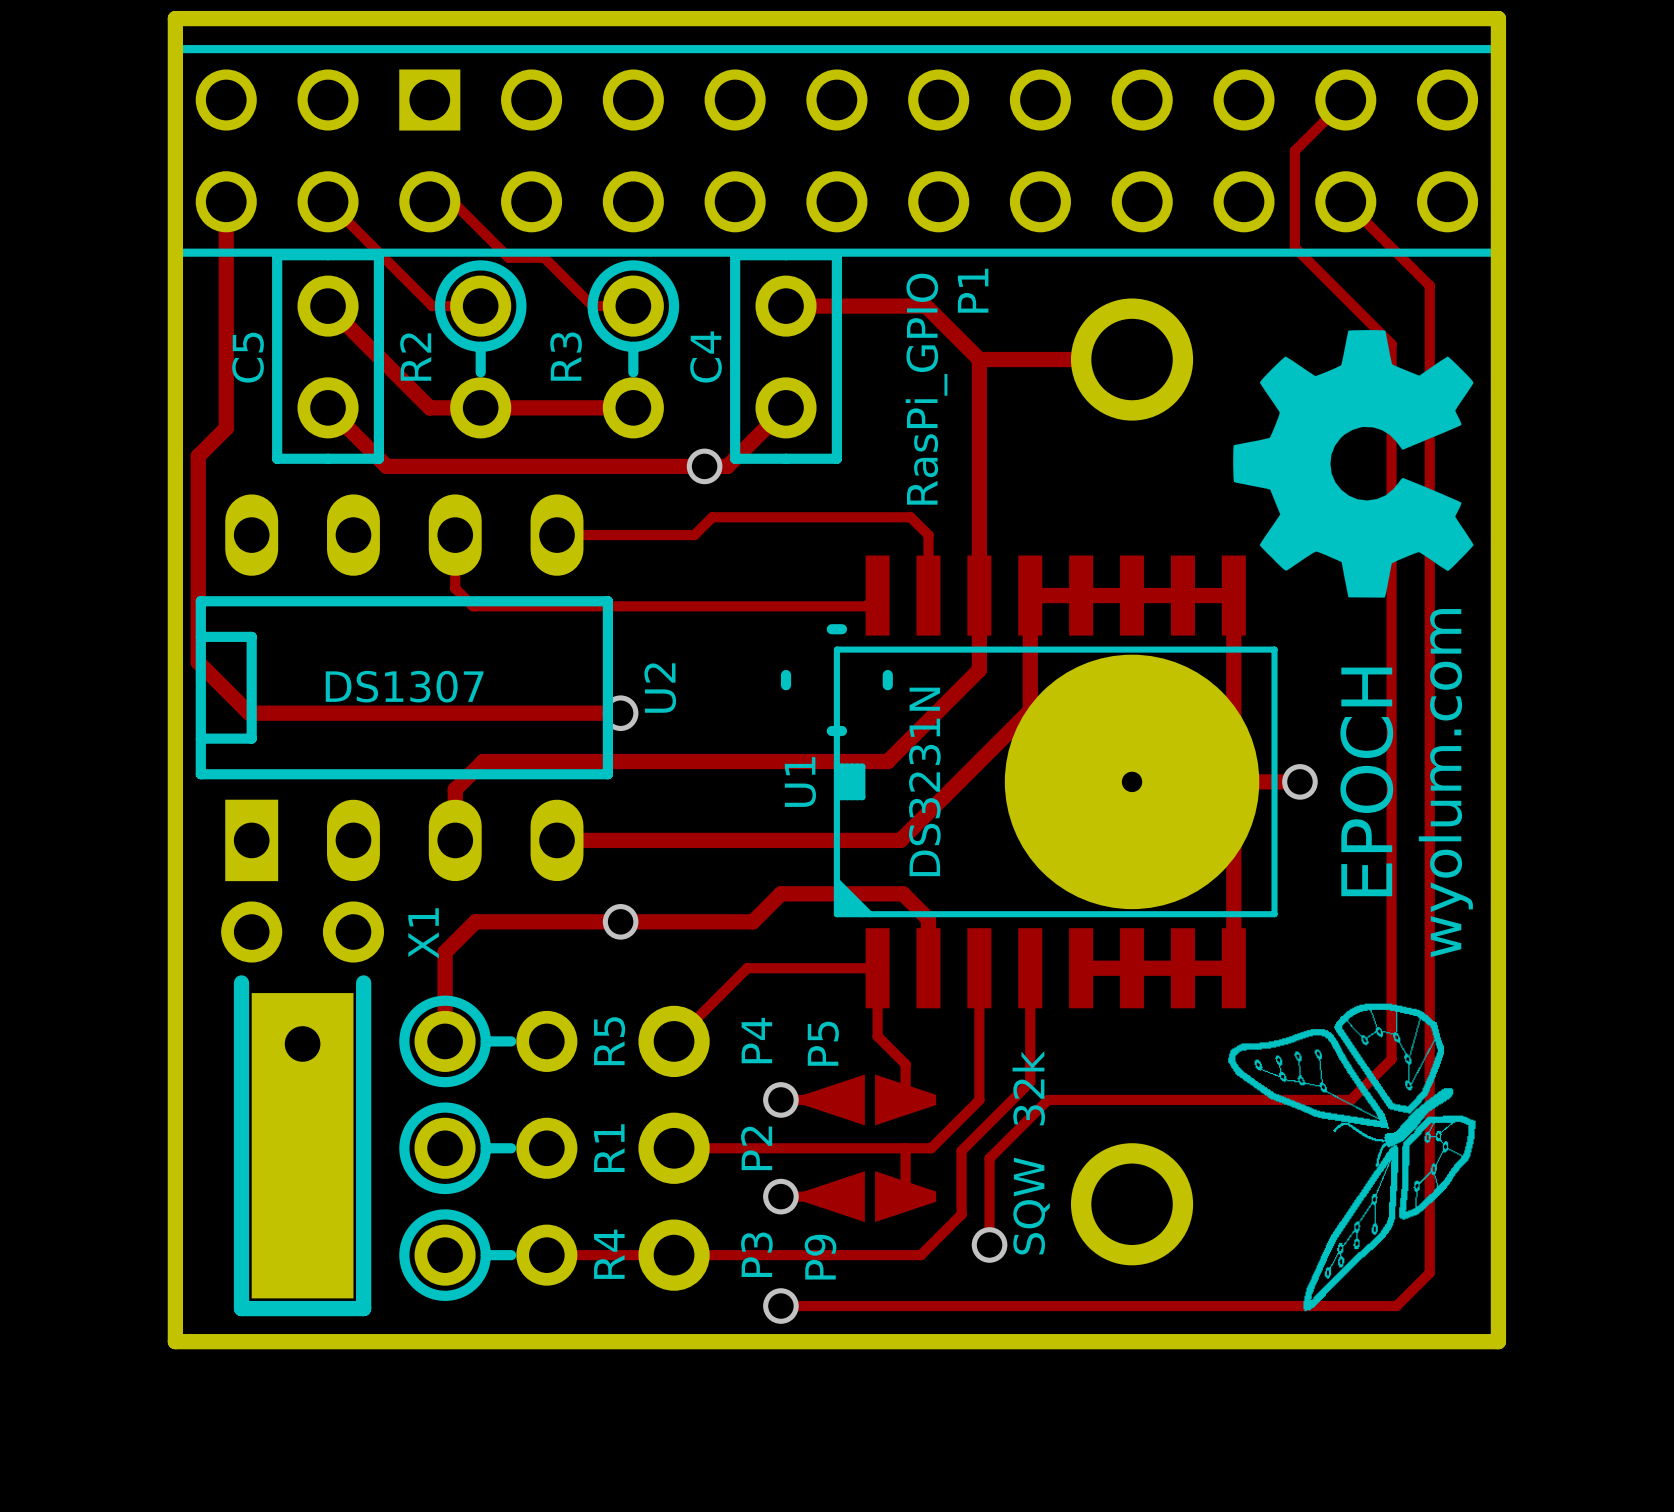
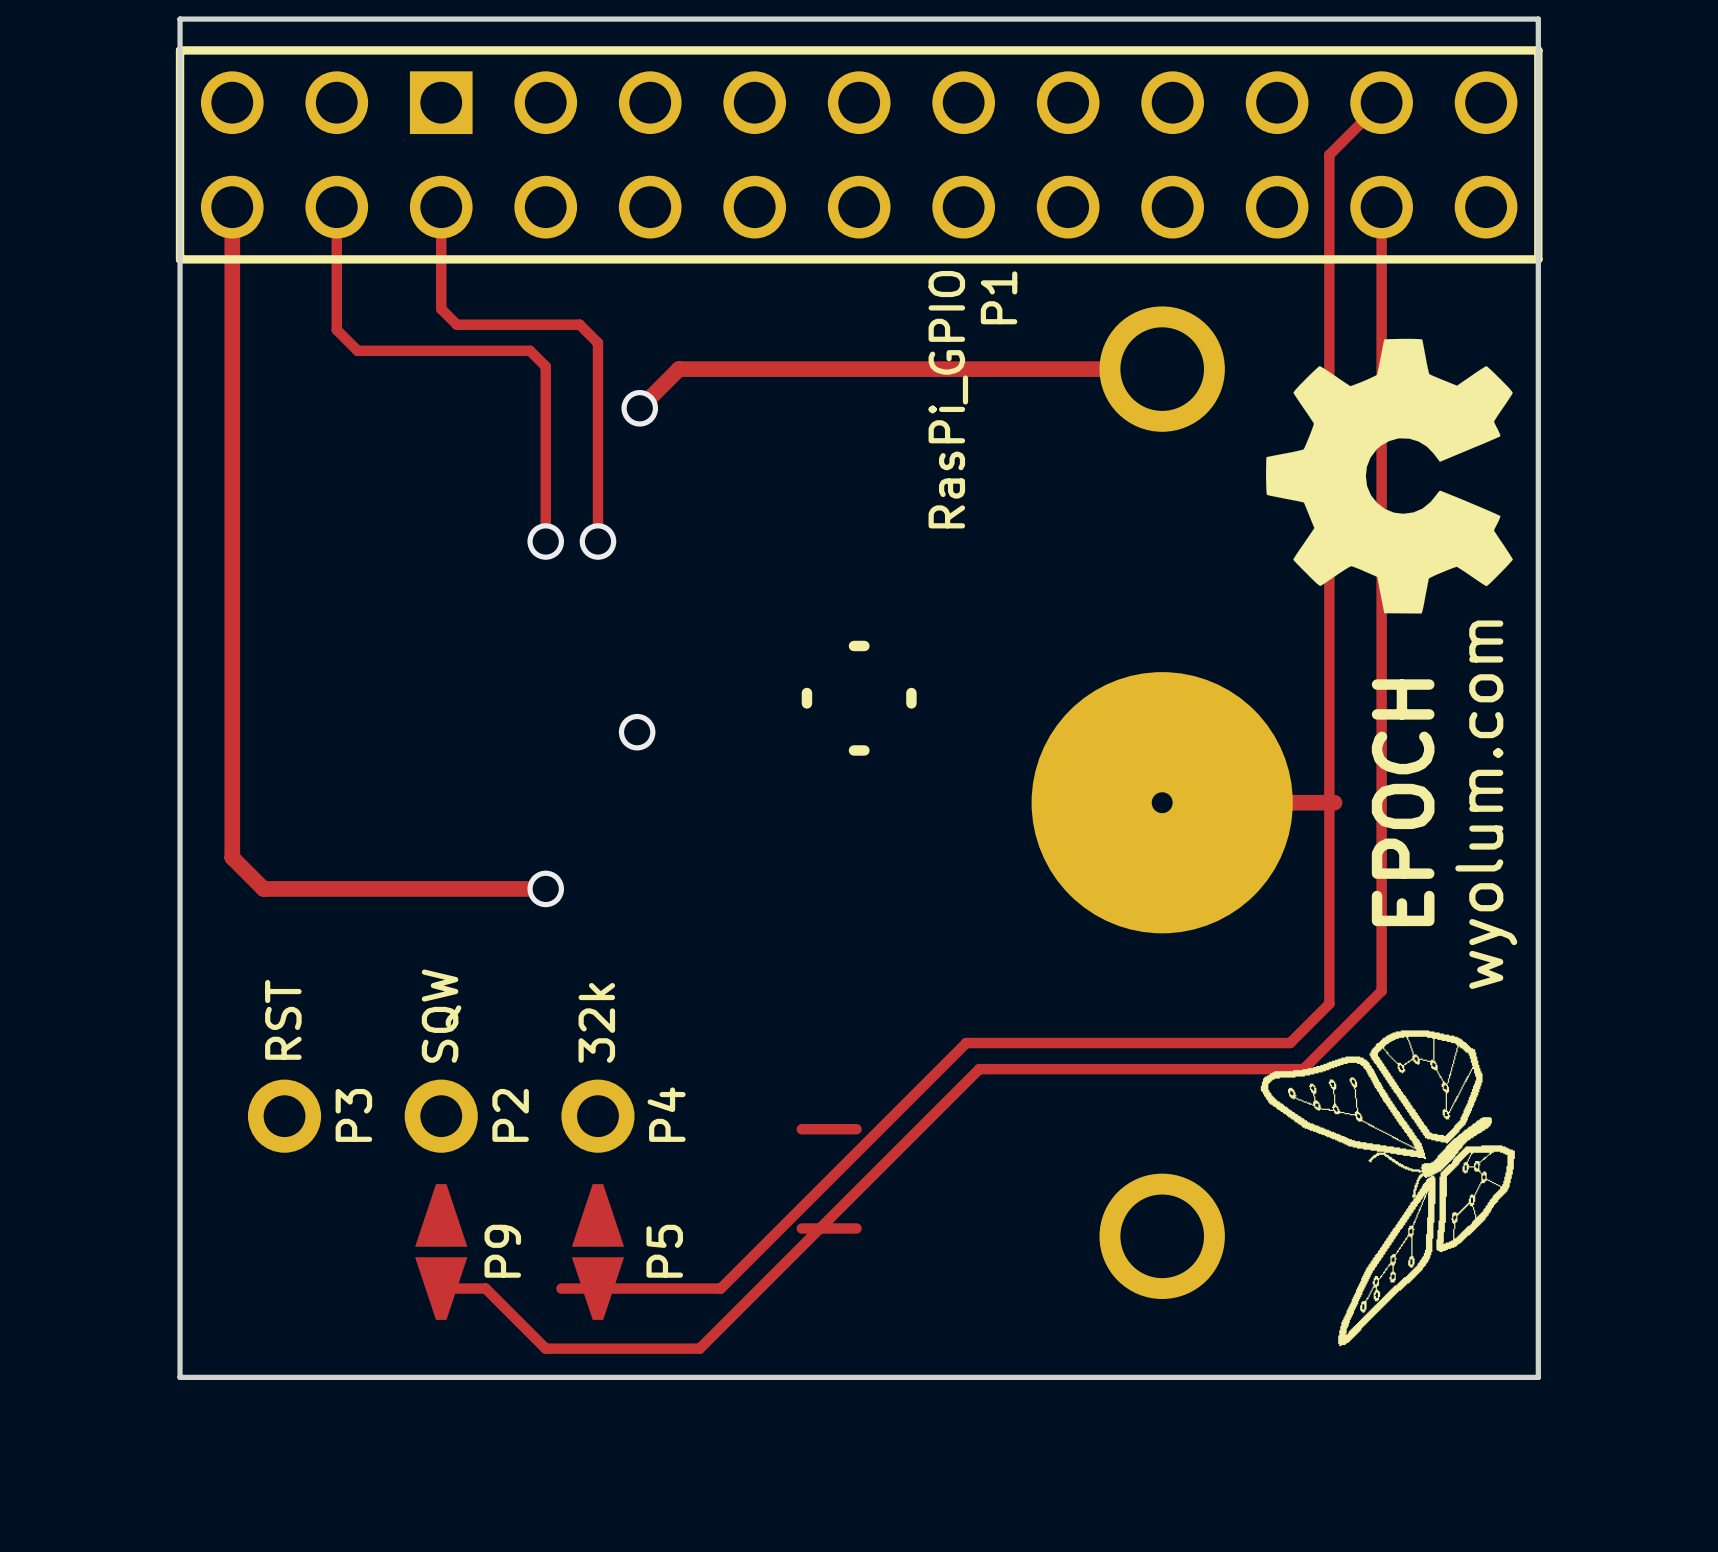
board edge width: thick (175, 18) (1498, 18) (1498, 1341) (175, 1341) (175, 18) -> thin (180, 19) (1538, 19) (1538, 1377) (180, 1377) (180, 19)
track: (328, 201) (432, 306) (480, 306) -> (336, 207) (336, 329) (357, 350) (530, 350) (545, 366) (545, 541)
track: (429, 201) (452, 201) (508, 257) (544, 257) (592, 306) (633, 306) -> (441, 207) (441, 309) (456, 324) (579, 324) (597, 342) (597, 541)
track: (1345, 201) (1429, 285) (1429, 1272) (1396, 1306) (780, 1306) -> (1381, 207) (1381, 991) (1303, 1069) (979, 1069) (699, 1348) (545, 1348) (485, 1288) (441, 1288)
track: (1294, 247) (1391, 344) (1391, 1059) (1350, 1099) (1048, 1099) (989, 1158) (989, 1244) -> (1329, 254) (1329, 1003) (1290, 1043) (966, 1043) (720, 1288)
track: (328, 306) (429, 407) (633, 407) -> none
track: (786, 306) (925, 306) (979, 359) (979, 669) (887, 761) (483, 761) (455, 789) (455, 840) -> none
R2: (480, 349) -> none
R3: (633, 349) -> none
C5: (328, 356) -> none
C4: (786, 356) -> none
track: none -> (1005, 369) (678, 369) (639, 408)
via: none -> (639, 408)
track: (328, 407) (386, 466) (727, 466) (786, 407) -> none
track: (226, 428) (198, 456) (198, 662) (249, 713) (620, 713) -> (232, 439) (232, 857) (263, 888) (545, 888)
via: (704, 466) -> none
via: none -> (545, 541)
via: none -> (597, 541)
track: (455, 535) (455, 588) (473, 606) (866, 606) (877, 595) -> none
track: (557, 535) (694, 535) (712, 517) (910, 517) (928, 535) (928, 595) -> none
U2: DS1307 (404, 687) -> none
U1: DS3231N (1055, 781) -> none
via: (1299, 781) -> none
track: (557, 840) (900, 840) (1030, 710) (1030, 595) (1233, 595) (1233, 968) (1081, 968) -> none
via position: (620, 921) -> (545, 888)
track: (928, 968) (928, 919) (903, 893) (780, 893) (752, 921) (475, 921) (445, 952) (445, 1041) -> none
track: (979, 968) (979, 1100) (931, 1148) (674, 1148) -> none
track: (1030, 968) (1030, 1082) (961, 1150) (961, 1214) (920, 1255) (702, 1255) -> none
P3 value: none -> RST (283, 1019)
P4 name position: P4 (756, 1040) -> P4 (666, 1114)
R5: (488, 1041) -> none
track: (674, 1041) (747, 968) (877, 968) (877, 1036) (905, 1064) (905, 1099) -> none
P4 position: (674, 1041) -> (597, 1116)
P5 value position: 32k (1028, 1088) -> 32k (596, 1022)
via: (780, 1099) -> none
P5 rotation: 0° (869, 1099) -> 90° clockwise (597, 1252)
P5 position: (869, 1099) -> (597, 1252)
X1: (302, 1108) -> none
R1: (488, 1148) -> none
P2 position: (674, 1148) -> (441, 1116)
P2 name position: P2 (756, 1148) -> P2 (510, 1115)
track: (905, 1148) (905, 1196) -> none
via: (780, 1196) -> none
P9 rotation: 0° (869, 1196) -> 90° clockwise (441, 1252)
P9 position: (869, 1196) -> (441, 1252)
P9 value position: SQW (1031, 1206) -> SQW (441, 1016)
via: (989, 1244) -> none
P3 name position: P3 (756, 1254) -> P3 (353, 1115)
R4: (488, 1255) -> none
P3 position: (674, 1255) -> (284, 1116)
P9 name position: P9 (820, 1257) -> P9 (502, 1251)
via: (780, 1306) -> none

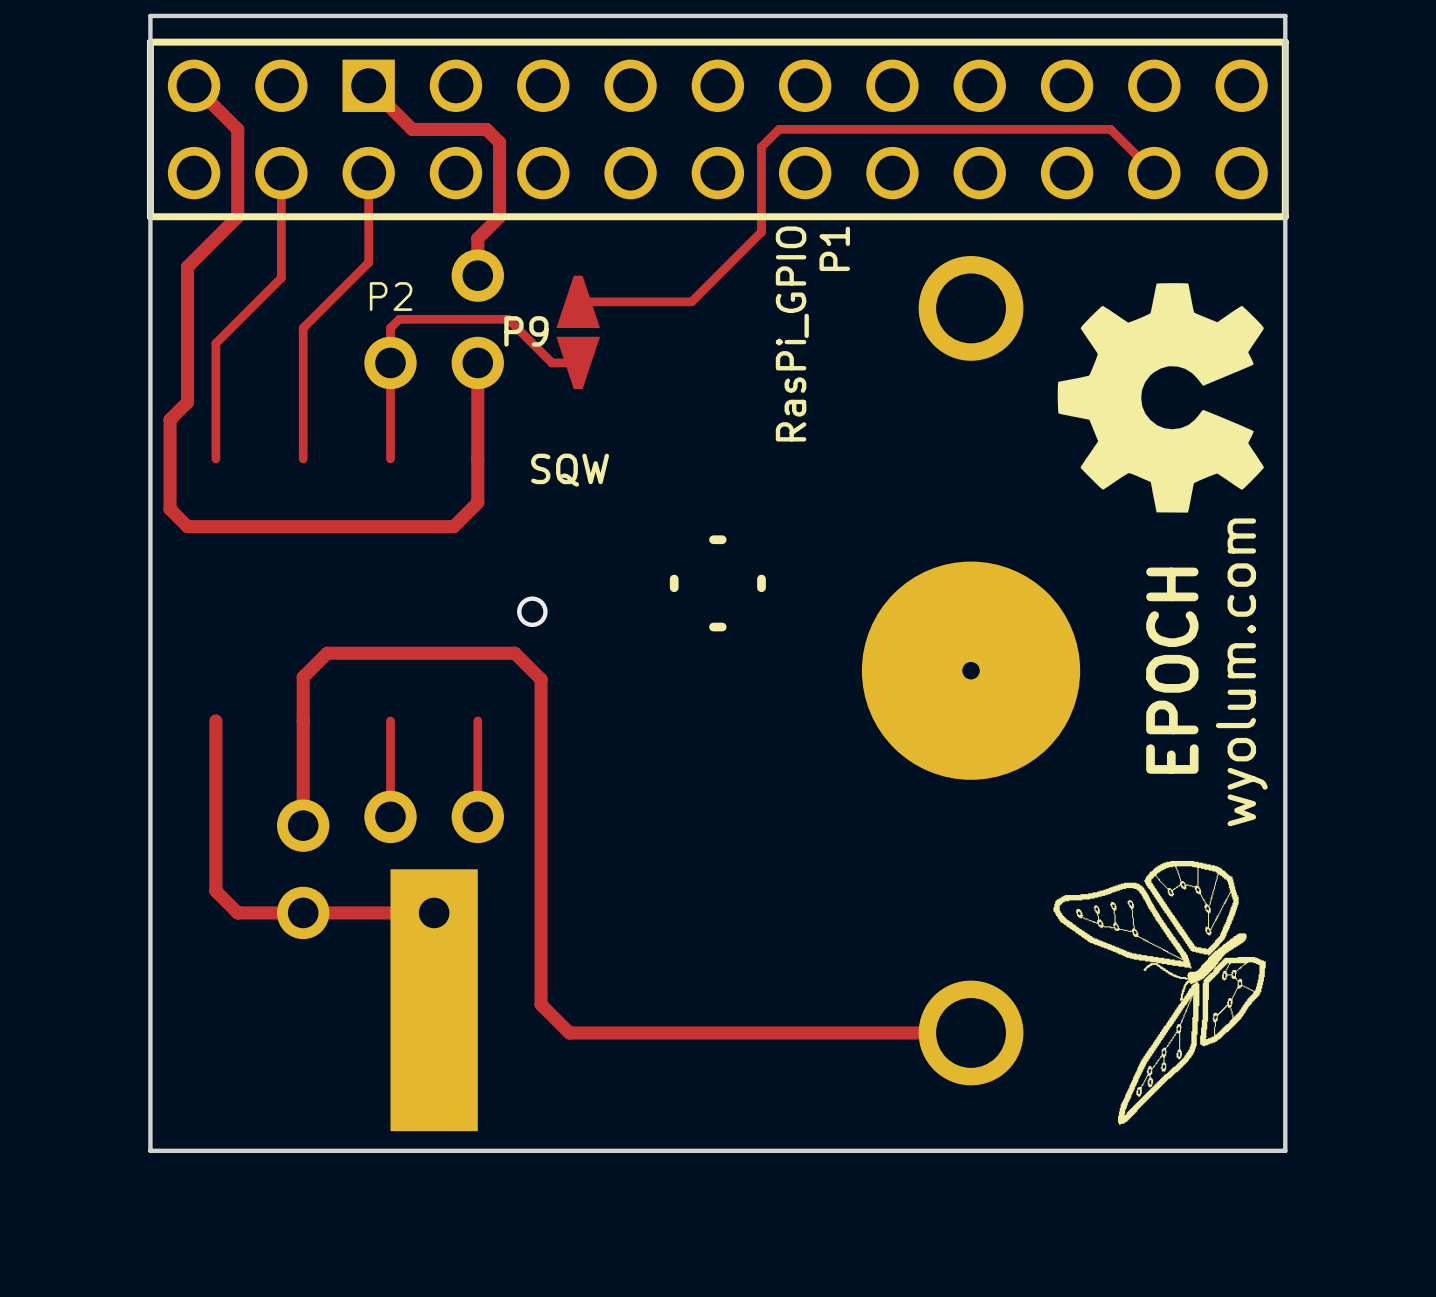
track: none -> (194, 85) (237, 129) (237, 216) (187, 266) (187, 402) (170, 419) (170, 509) (187, 526) (453, 526) (477, 502) (477, 362)
track: none -> (368, 85) (412, 129) (486, 129) (499, 142) (499, 216) (477, 238) (477, 275)
track: (1381, 102) (1329, 154) (1329, 1003) (1290, 1043) (966, 1043) (720, 1288) (561, 1288) -> none
track: (232, 207) (232, 857) (263, 888) (545, 888) -> none
track: (1381, 207) (1381, 991) (1303, 1069) (979, 1069) (699, 1348) (545, 1348) (485, 1288) (441, 1288) -> (1154, 173) (1110, 129) (778, 129) (761, 146) (761, 232) (691, 301) (578, 301)
track: (441, 309) (456, 324) (579, 324) (597, 342) (597, 541) -> (368, 258) (368, 262) (303, 328) (303, 458)
track: (336, 329) (357, 350) (530, 350) (545, 366) (545, 541) -> (281, 275) (281, 277) (215, 343) (215, 458)
track: (1162, 369) (678, 369) (639, 408) -> none
part: none -> (477, 319)
via: (639, 408) -> none
track: none -> (578, 362) (551, 362) (508, 319) (399, 319) (390, 328) (390, 458)
via: (545, 541) -> none
via: (597, 541) -> none
track: (1266, 802) (1334, 802) -> none
track: none -> (215, 720) (215, 891) (237, 912) (434, 912)
track: none -> (390, 720) (390, 816)
track: none -> (477, 720) (477, 816)
via: (545, 888) -> none
track: none -> (303, 825) (303, 677) (327, 653) (514, 653) (541, 679) (541, 1004) (569, 1032) (971, 1032)
P9 value rotation: 0° (441, 1016) -> 90° clockwise (570, 470)
P9 value position: SQW (441, 1016) -> SQW (570, 470)
part: none -> (303, 869)
P2 footprint: [404, 1079, 478, 1153] -> [364, 336, 417, 390]
P2 name position: P2 (510, 1115) -> P2 (391, 296)
P3: RST (284, 1116) -> none
P4: (597, 1116) -> none
track: (801, 1129) (856, 1129) -> none
part: none -> (434, 960)
track: (801, 1228) (856, 1228) -> none
P9 name rotation: 0° (502, 1251) -> 90° clockwise (526, 331)
P9 name position: P9 (502, 1251) -> P9 (526, 331)
P9 position: (441, 1252) -> (578, 332)
P5: 32k (597, 1252) -> none

